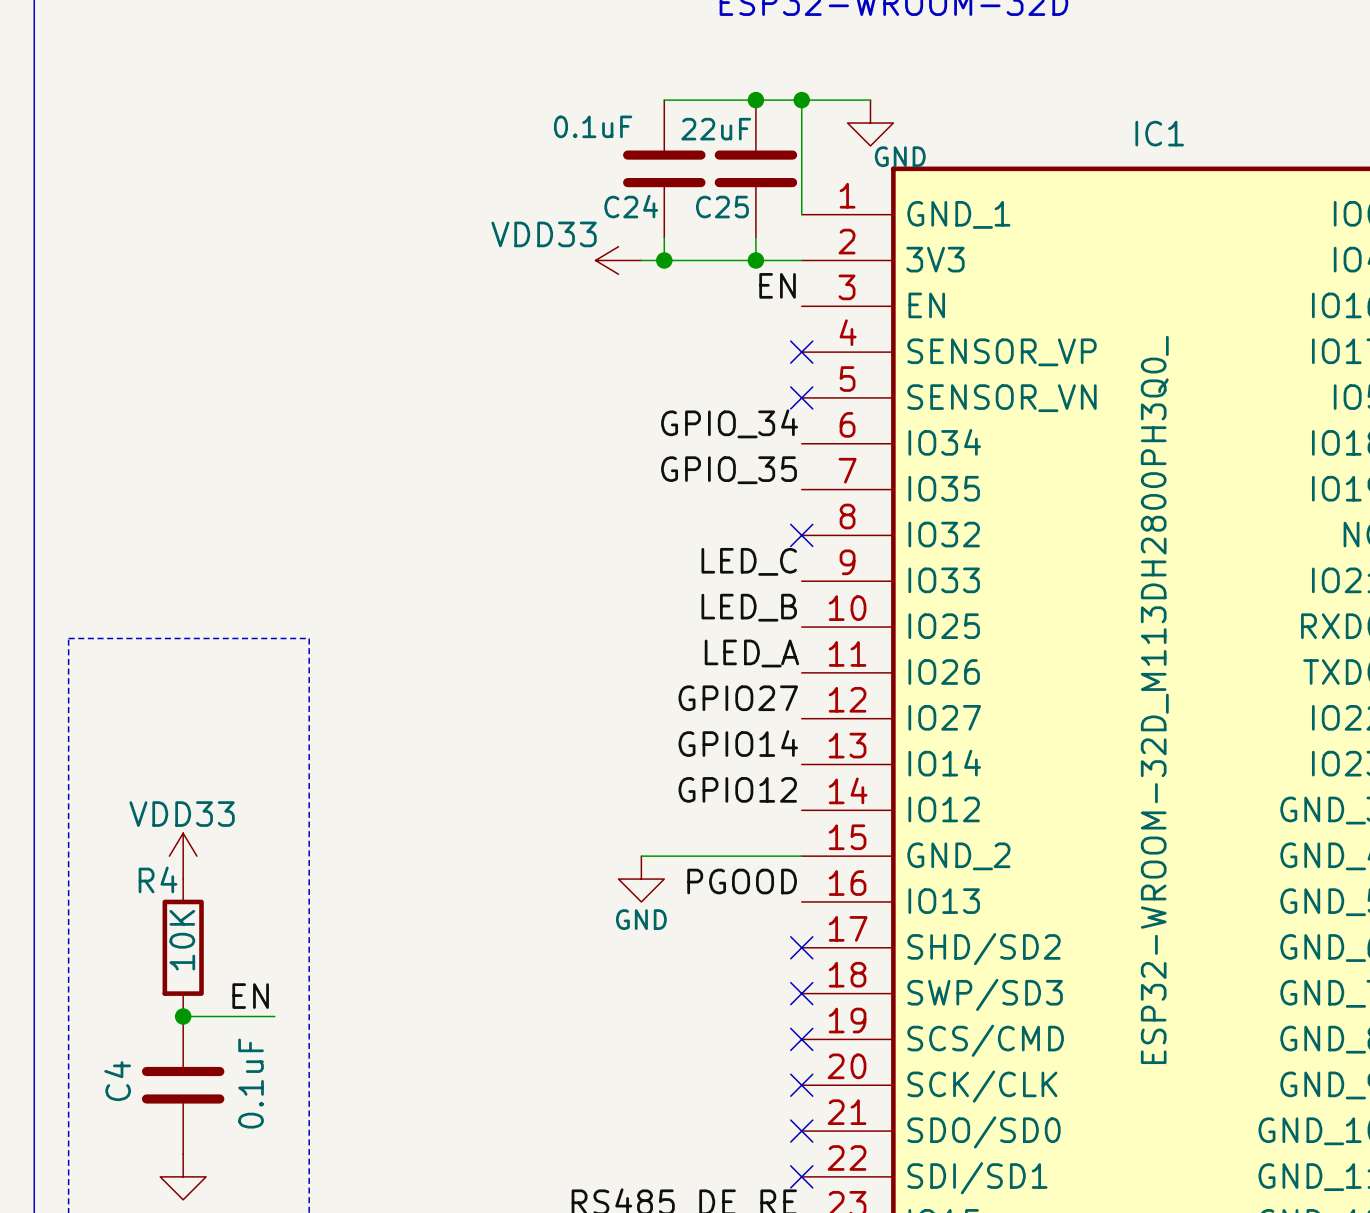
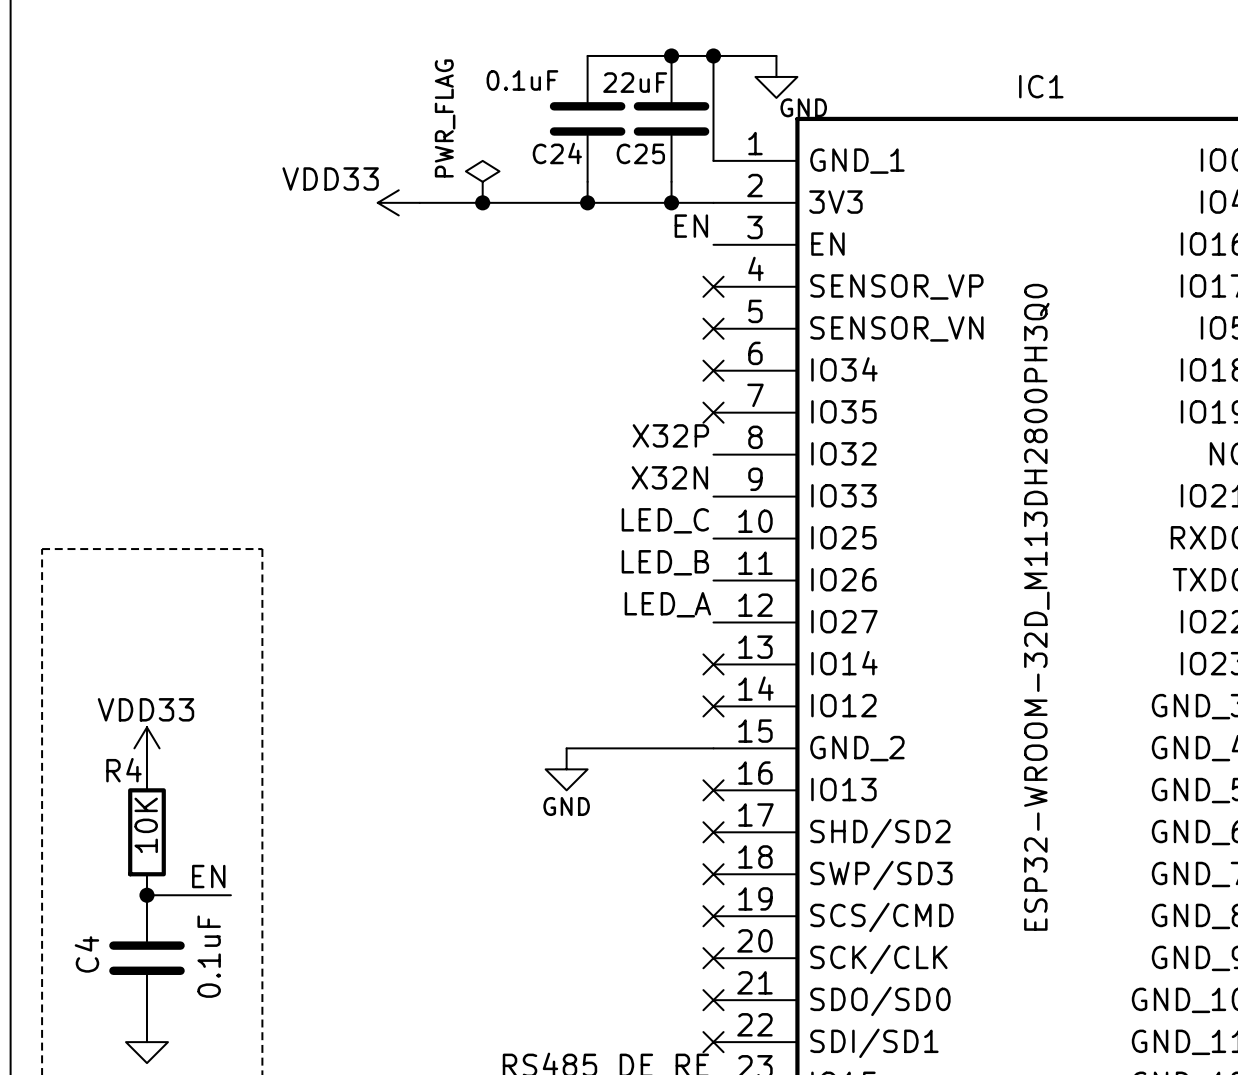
power symbol: none -> PWR_FLAG (482, 181)
wire: none -> (419, 202) (566, 202)
junction: none -> (482, 202)
power symbol position: VDD33 (618, 260) -> VDD33 (398, 202)
label: GPIO_34 (729, 423) -> none
no-connect mark: none -> (713, 370)
label: GPIO_35 (729, 470) -> none
no-connect mark: none -> (713, 412)
label: none -> X32P (670, 435)
no-connect mark: (801, 535) -> none
label: LED_C (749, 561) -> X32N (669, 477)
label: LED_B (749, 607) -> LED_C (665, 520)
label: LED_A (751, 653) -> LED_B (665, 562)
label: GPIO27 (738, 698) -> LED_A (667, 604)
IC1 value: ESP32-WROOM-32D_M113DH2800PH3Q0_ (1154, 699) -> ESP32-WROOM-32D_M113DH2800PH3Q0 (1036, 607)
label: GPIO14 (738, 743) -> none
no-connect mark: none -> (713, 664)
label: GPIO12 (737, 789) -> none
no-connect mark: none -> (713, 706)
label: PGOOD (742, 881) -> none
no-connect mark: none -> (713, 790)

